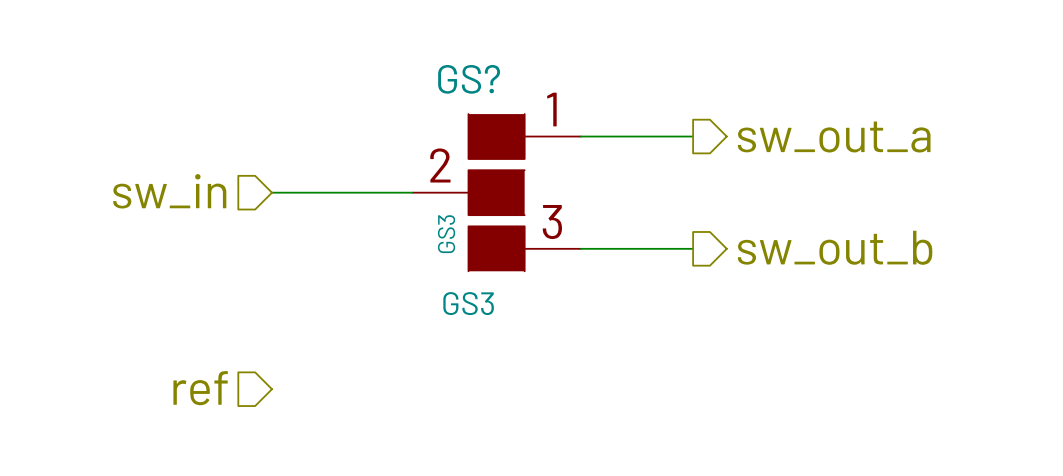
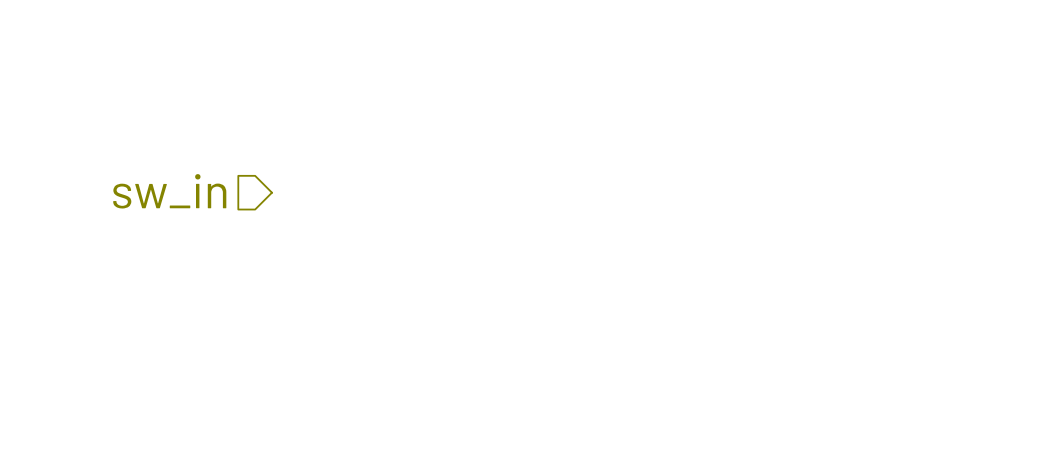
wire: (580, 136) (693, 136) -> none
hierarchical label: sw_out_a (834, 137) -> none
wire: (271, 192) (412, 192) -> none
GS?: GS3 (496, 192) -> none
hierarchical label: sw_out_b (835, 247) -> none
wire: (580, 248) (693, 248) -> none
hierarchical label: ref (200, 388) -> none

